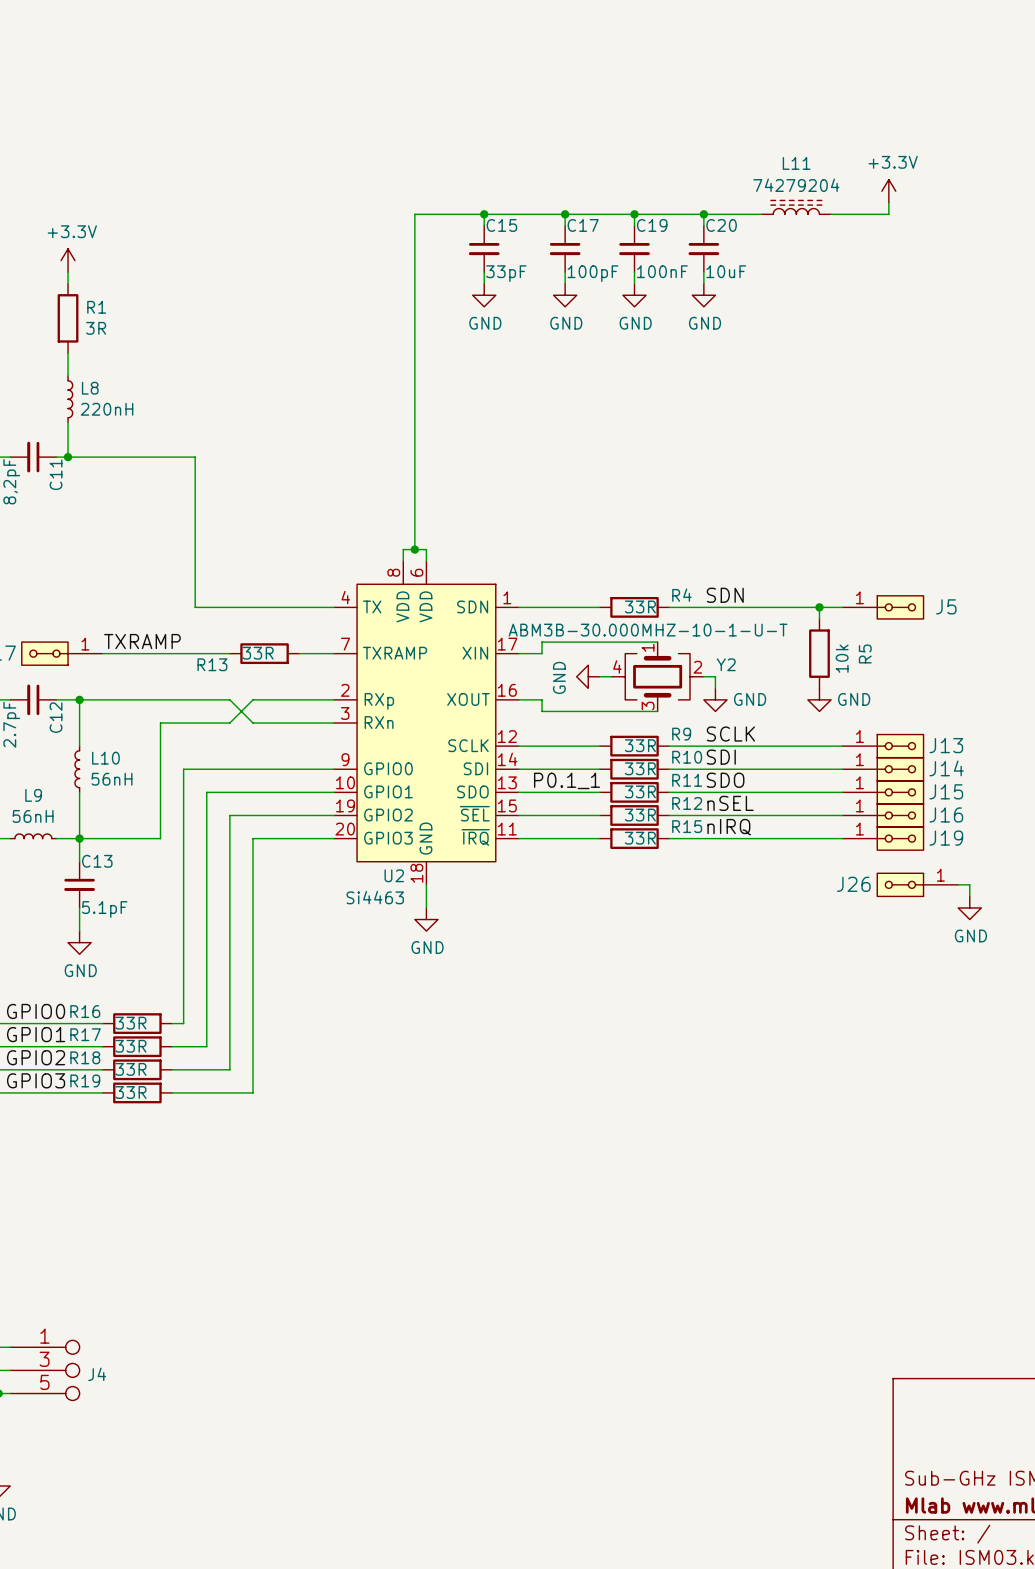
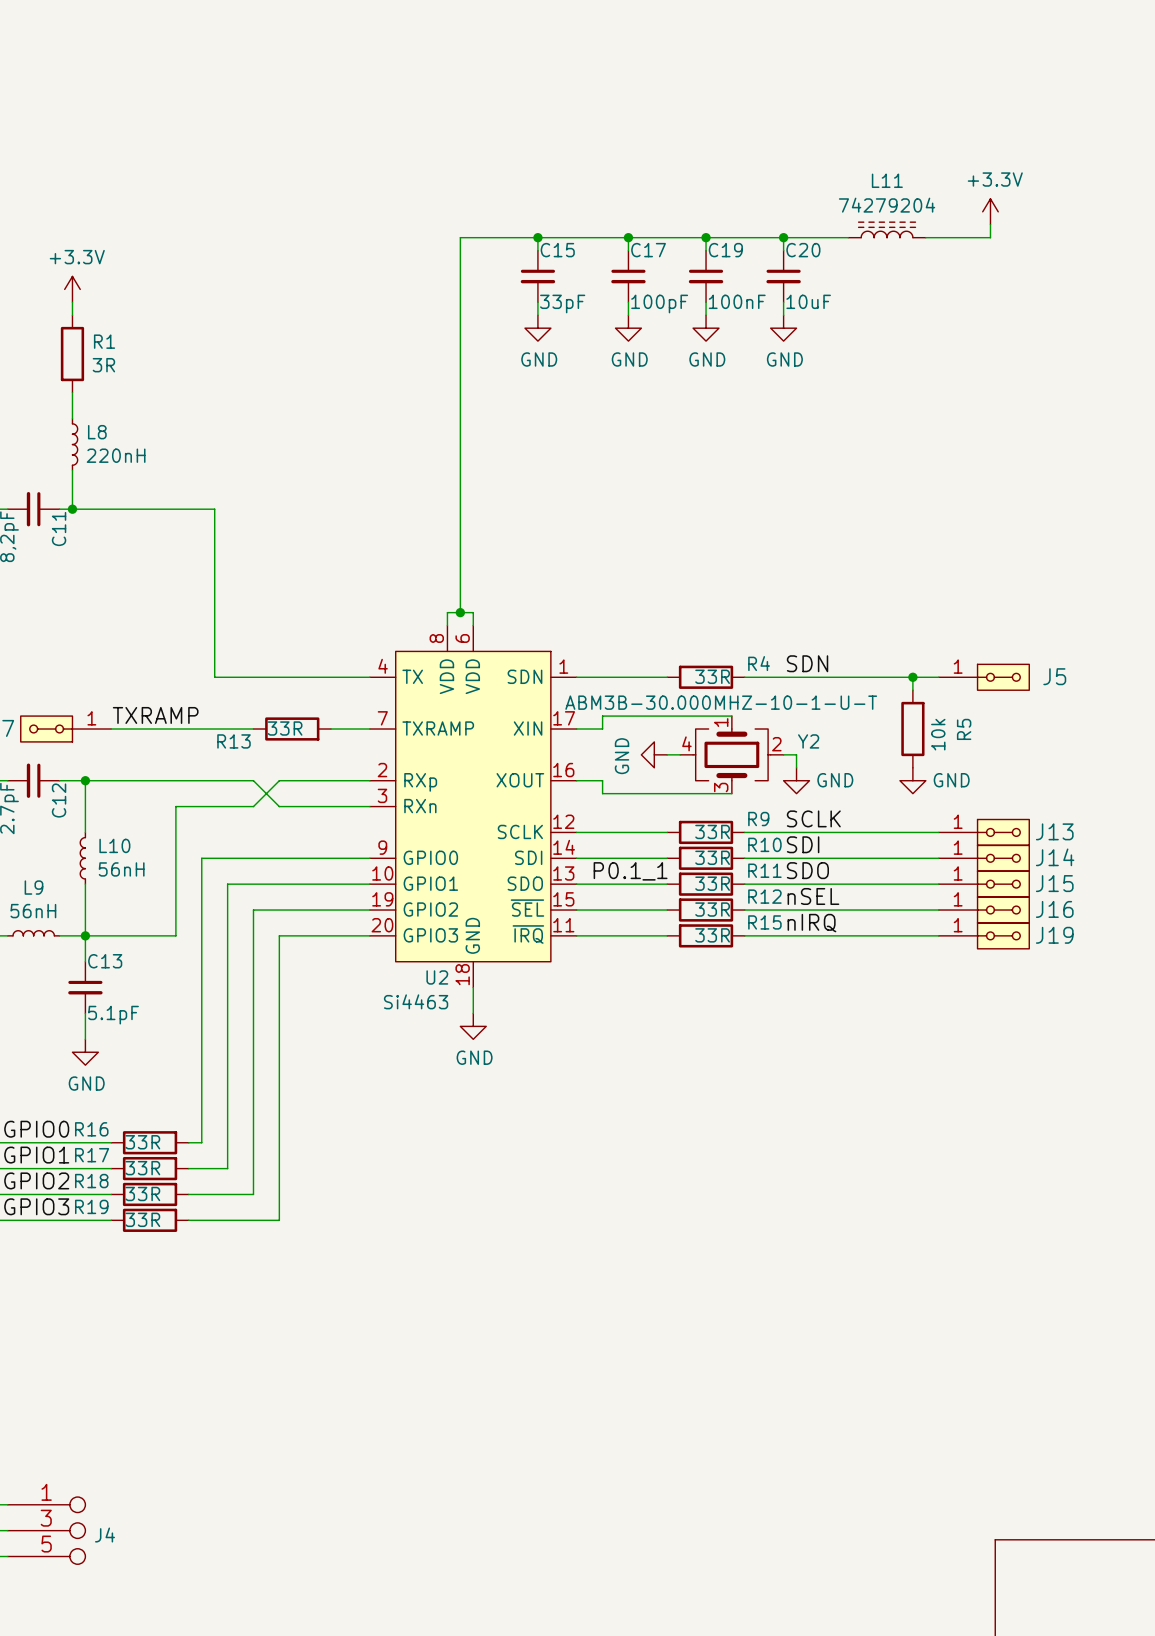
J26: (917, 884) -> none
wire: (958, 884) (969, 884) (969, 896) -> none
power symbol: GND (969, 907) -> none

